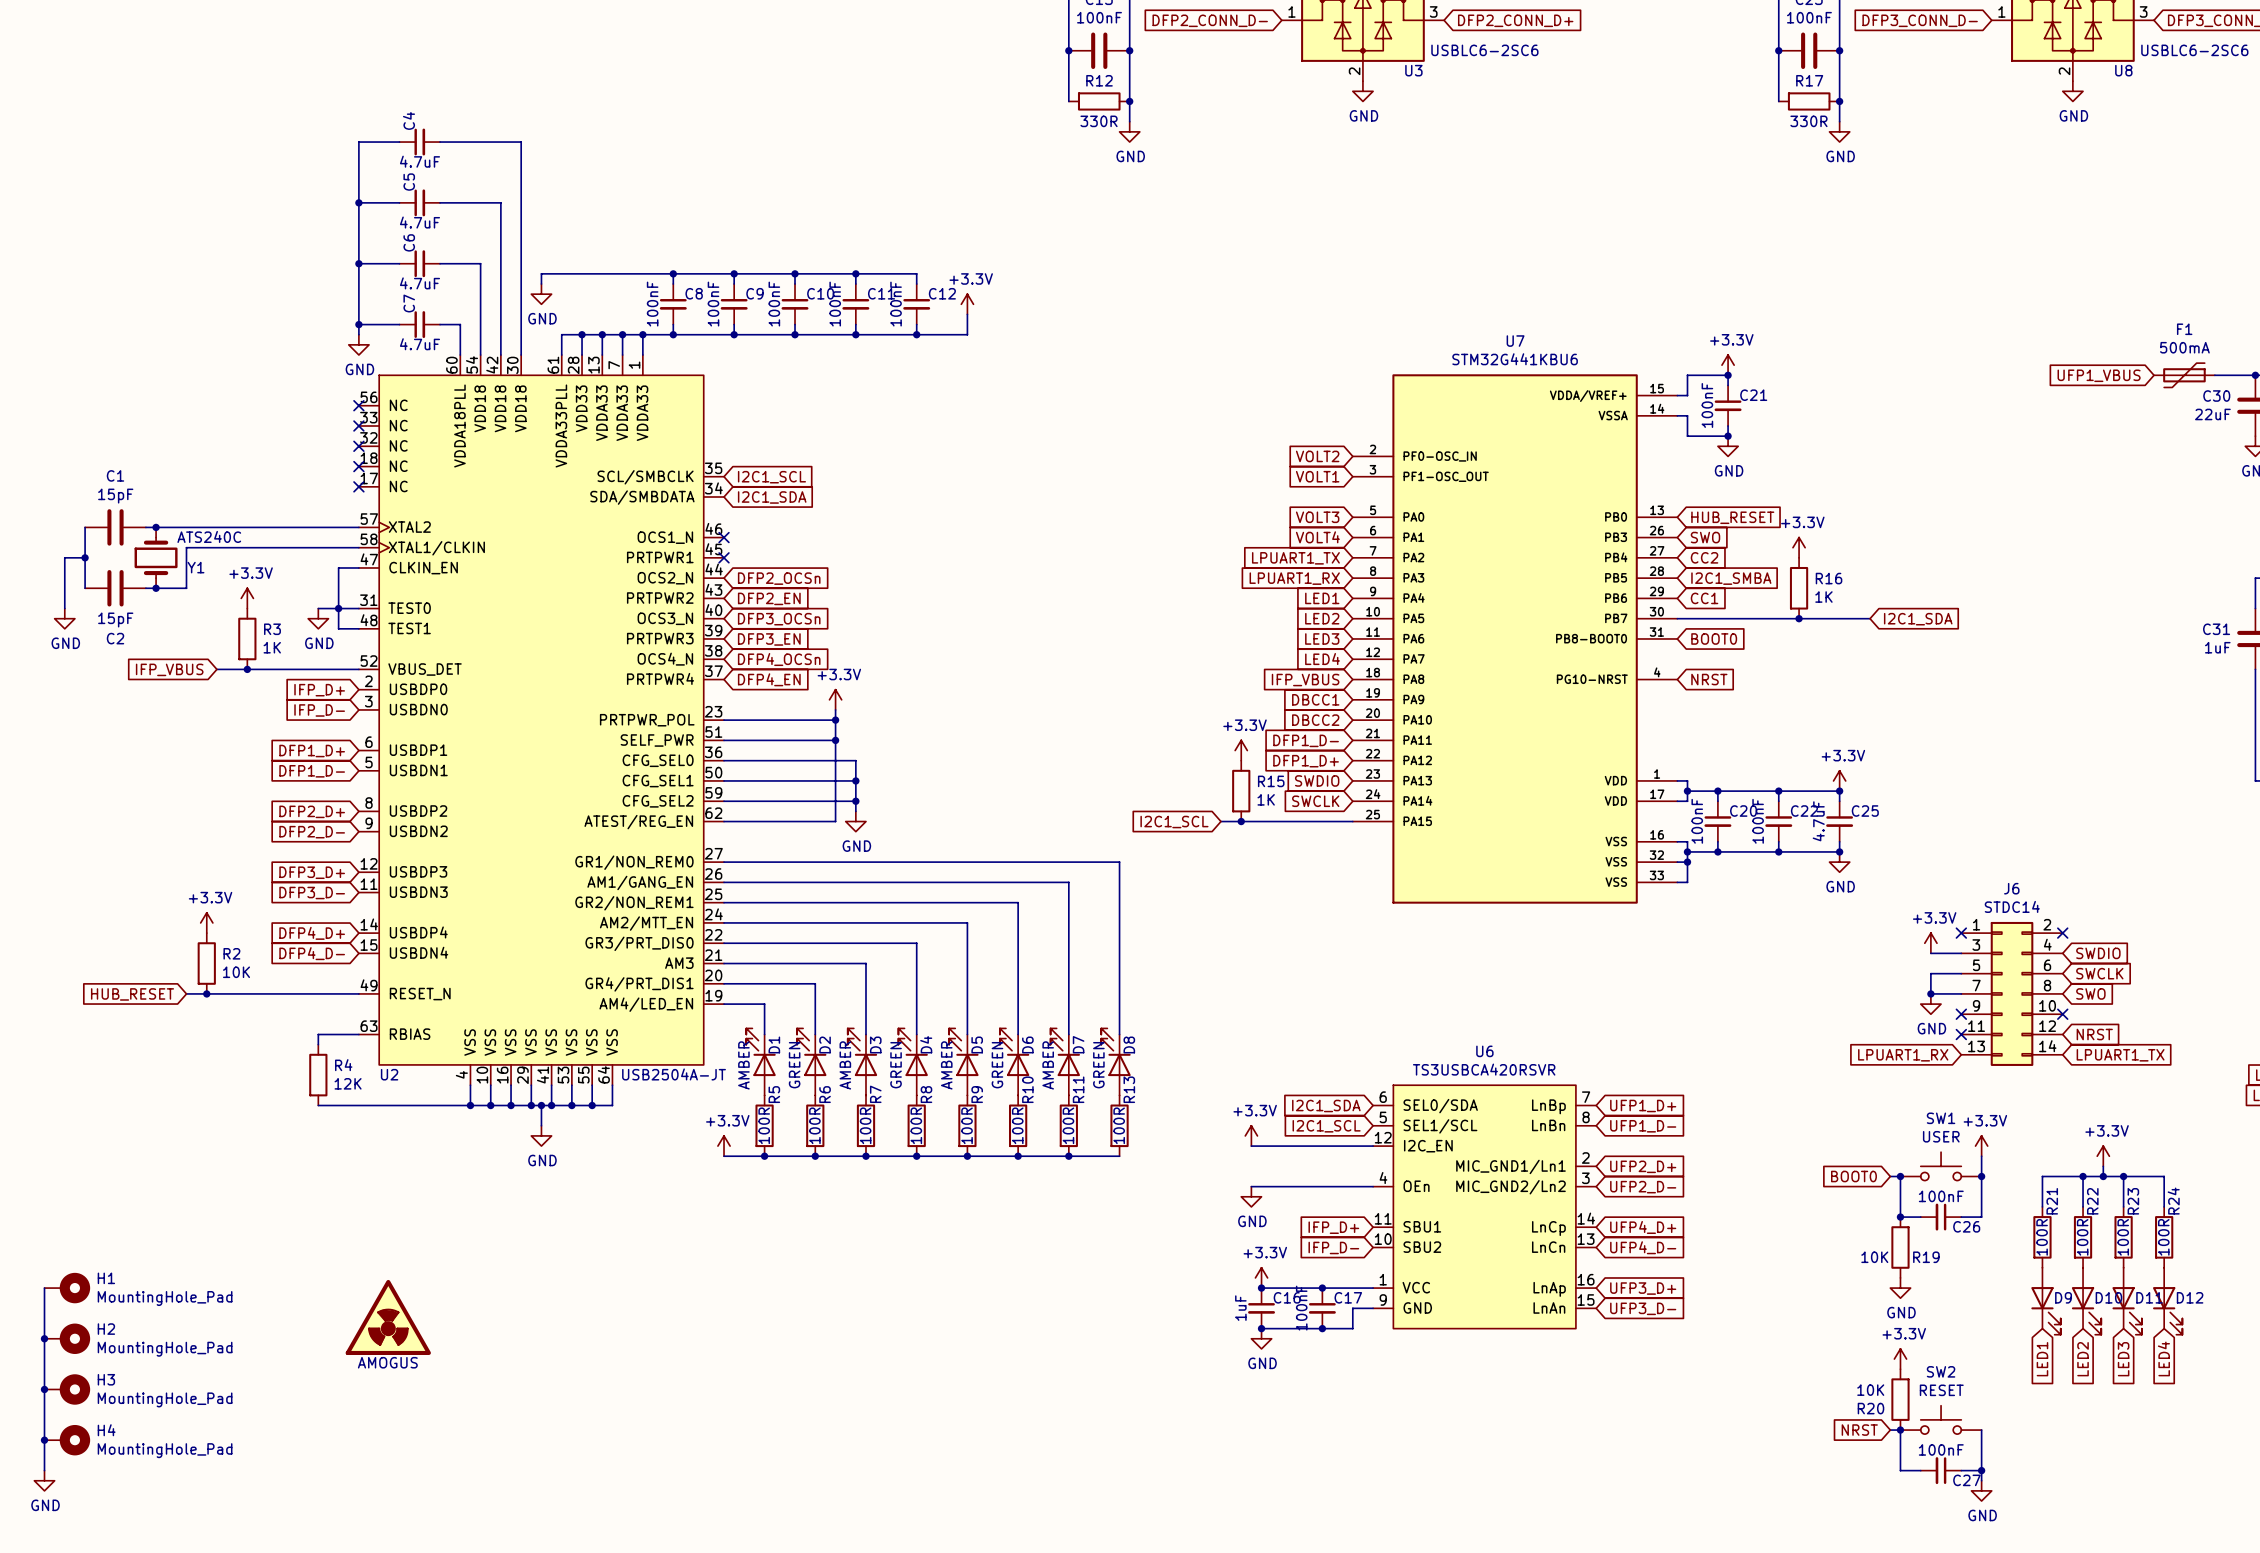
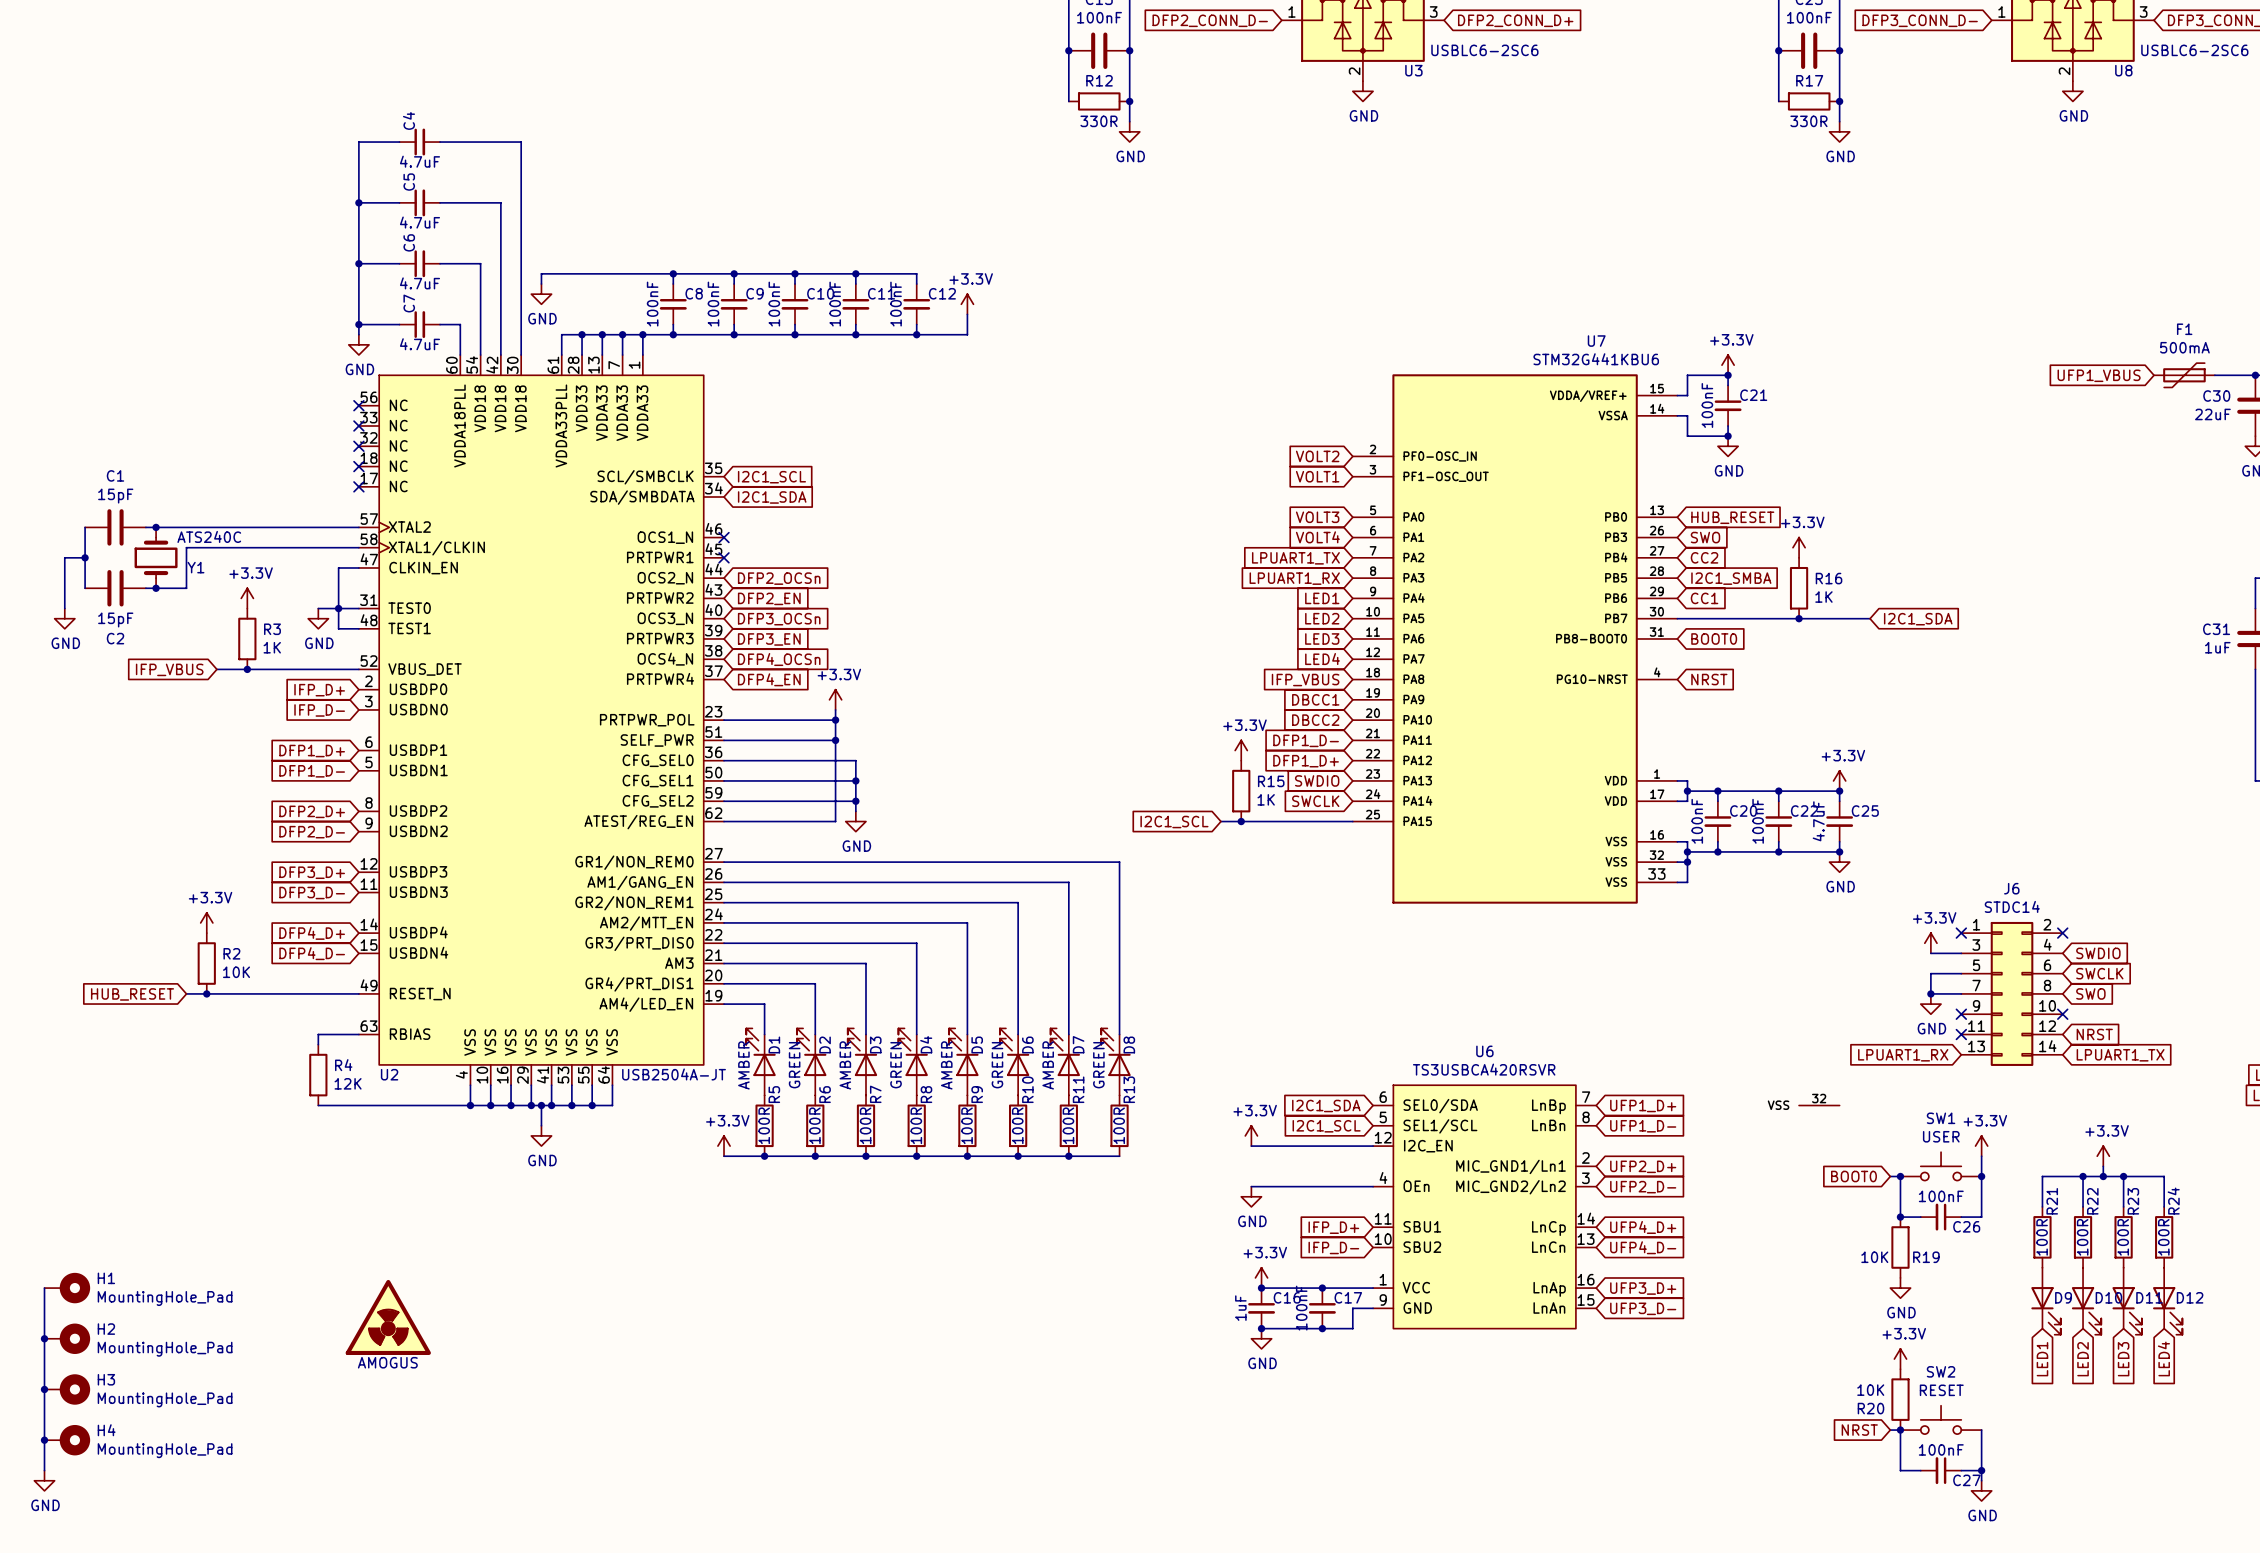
U7 name position: U7 (1515, 341) -> U7 (1596, 341)
U7 value position: STM32G441KBU6 (1515, 359) -> STM32G441KBU6 (1596, 359)
U7 symbol: [1352, 374, 1678, 904] -> [1352, 374, 1840, 1106]

